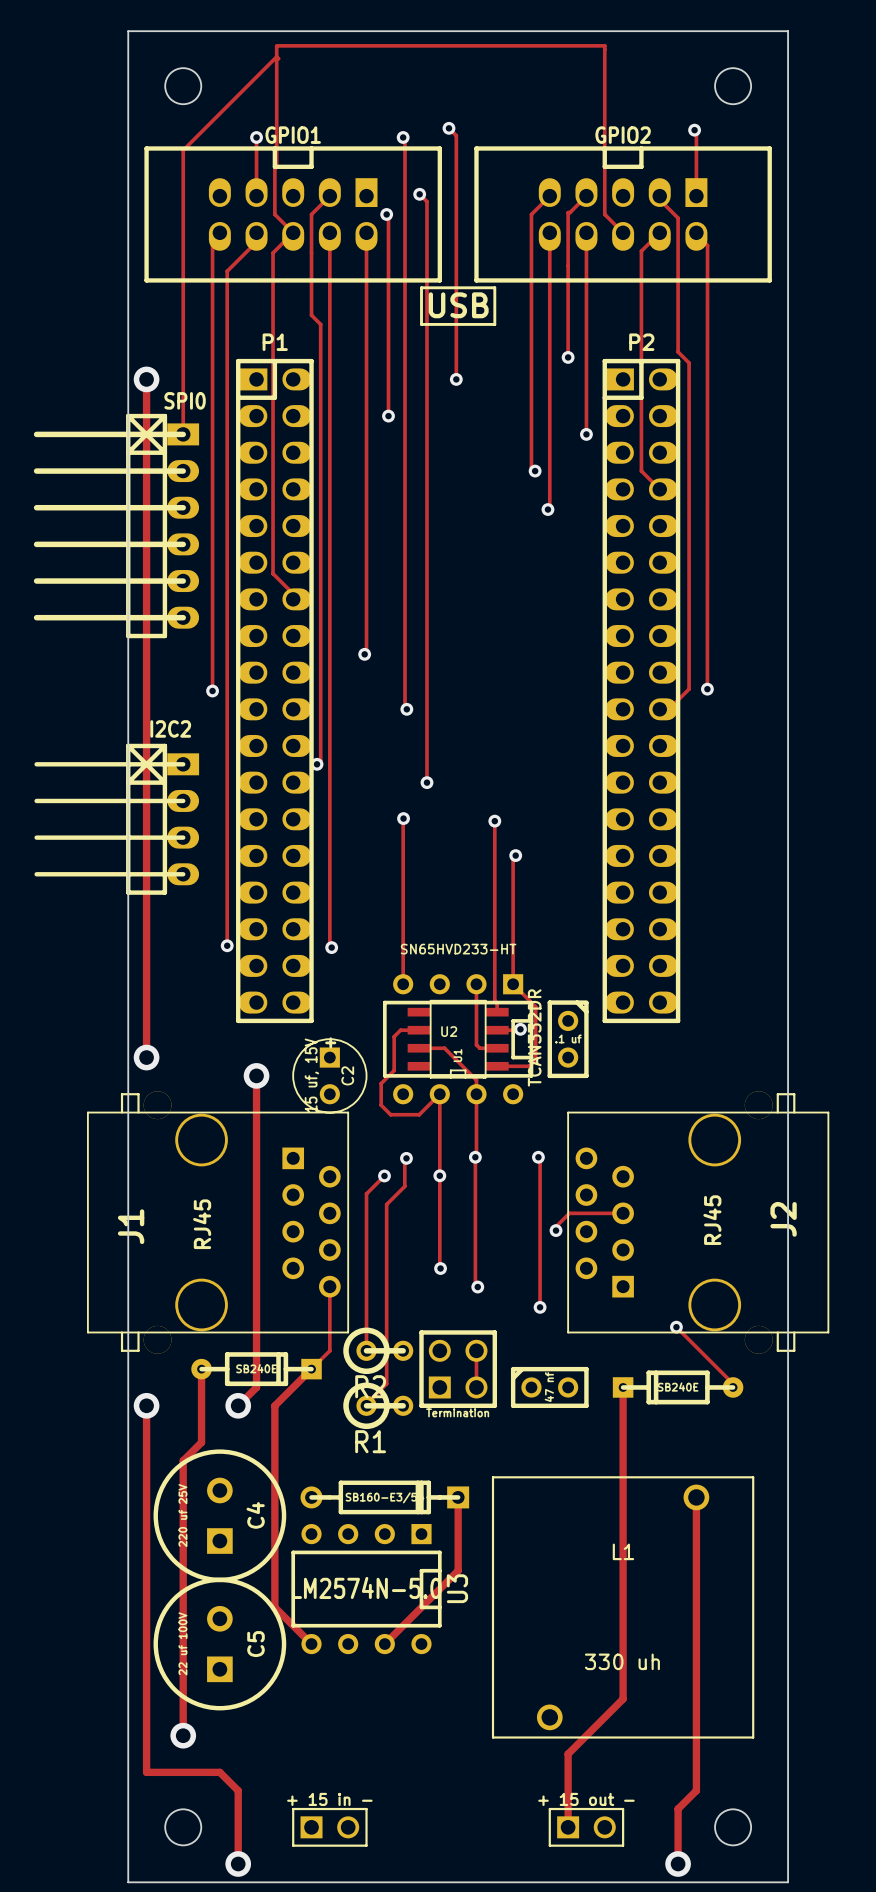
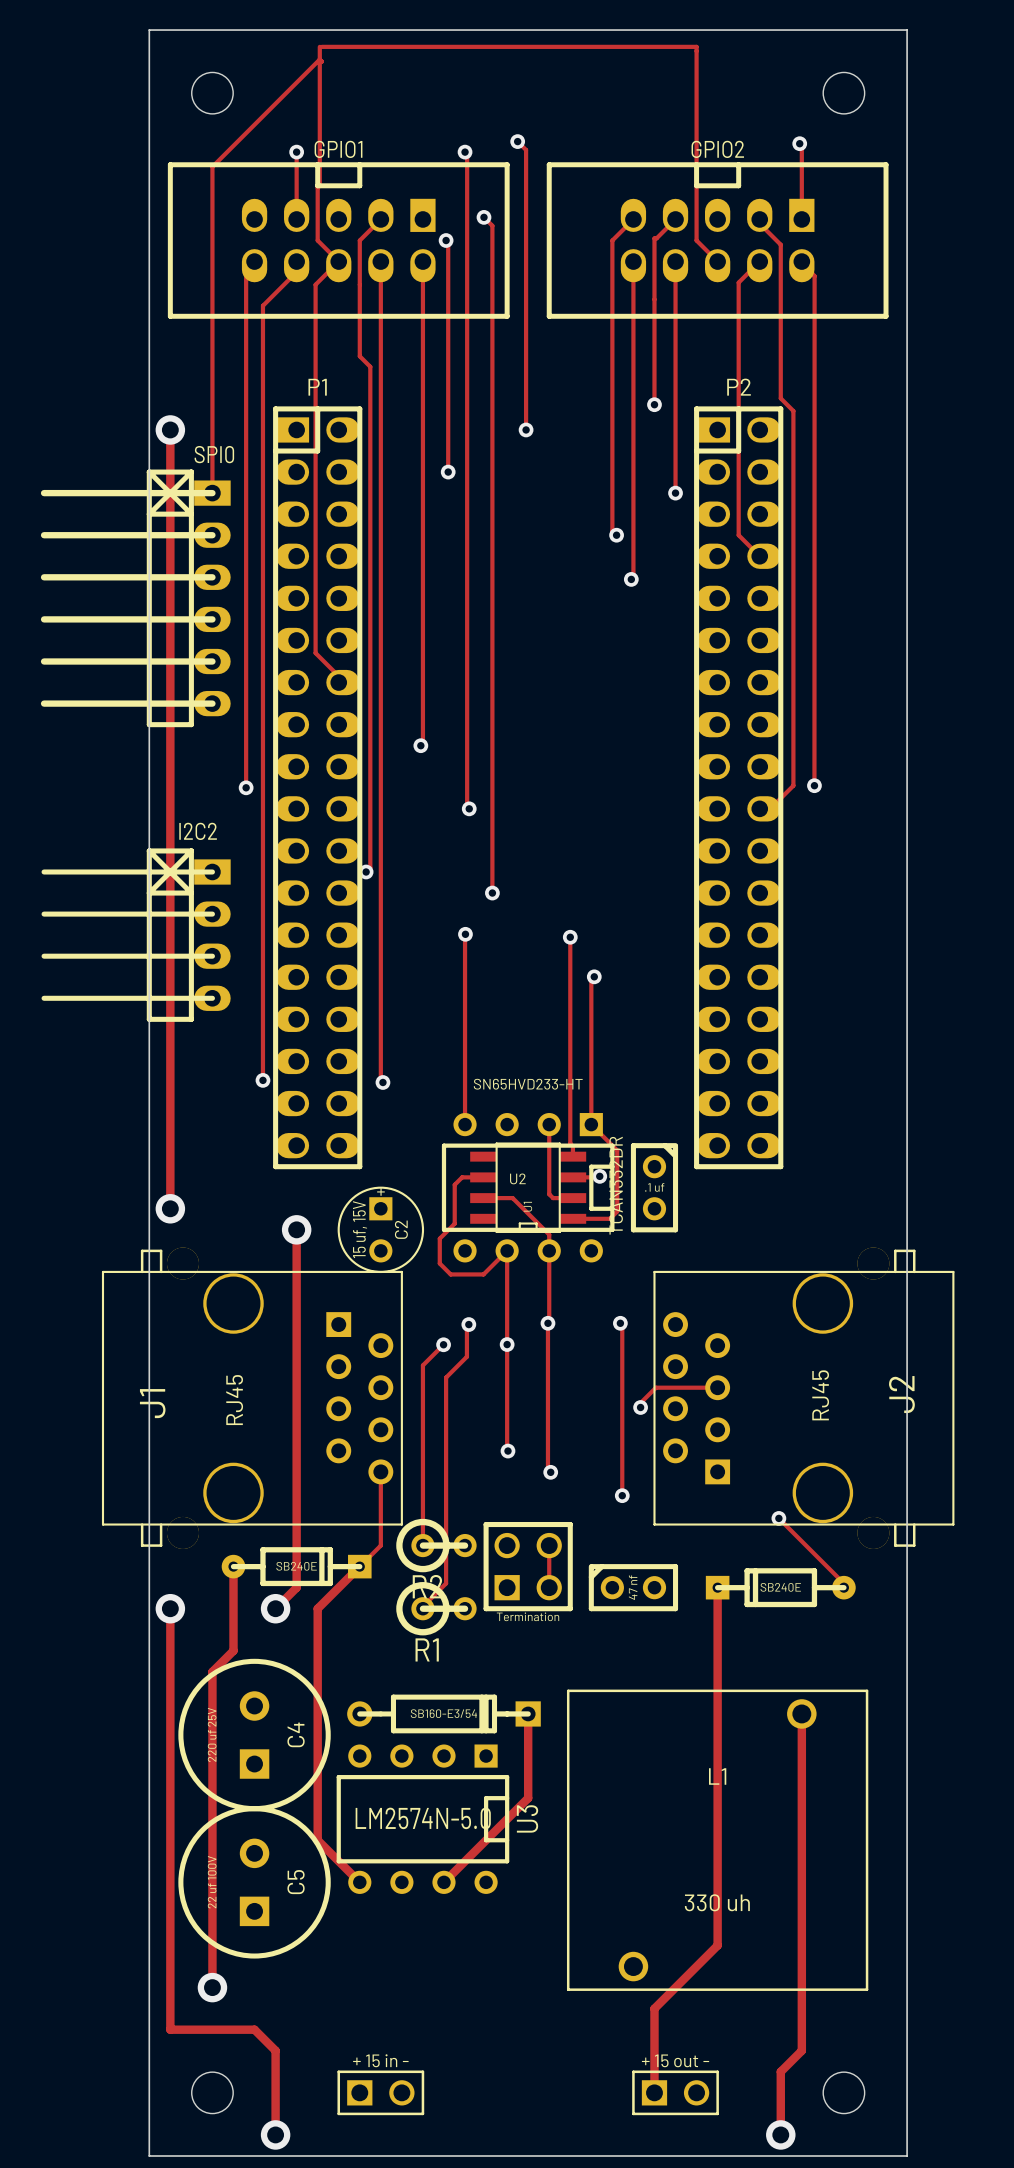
line: (421, 287) (421, 324) (494, 324) (494, 287) (421, 287) -> none
text: USB (458, 305) -> none

